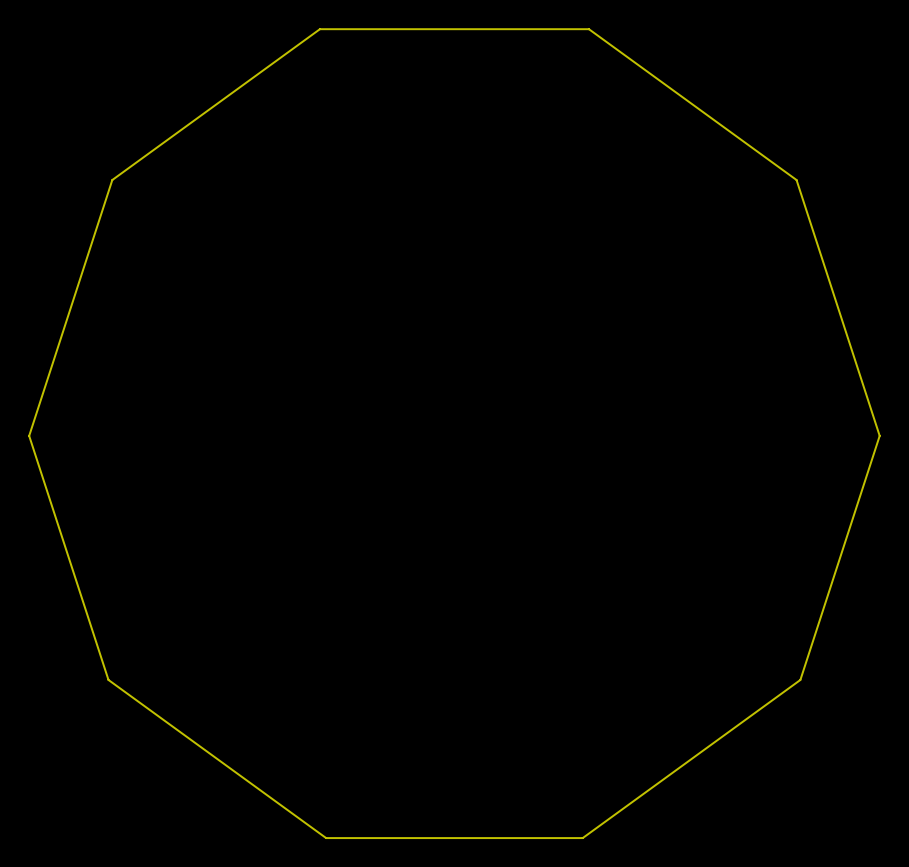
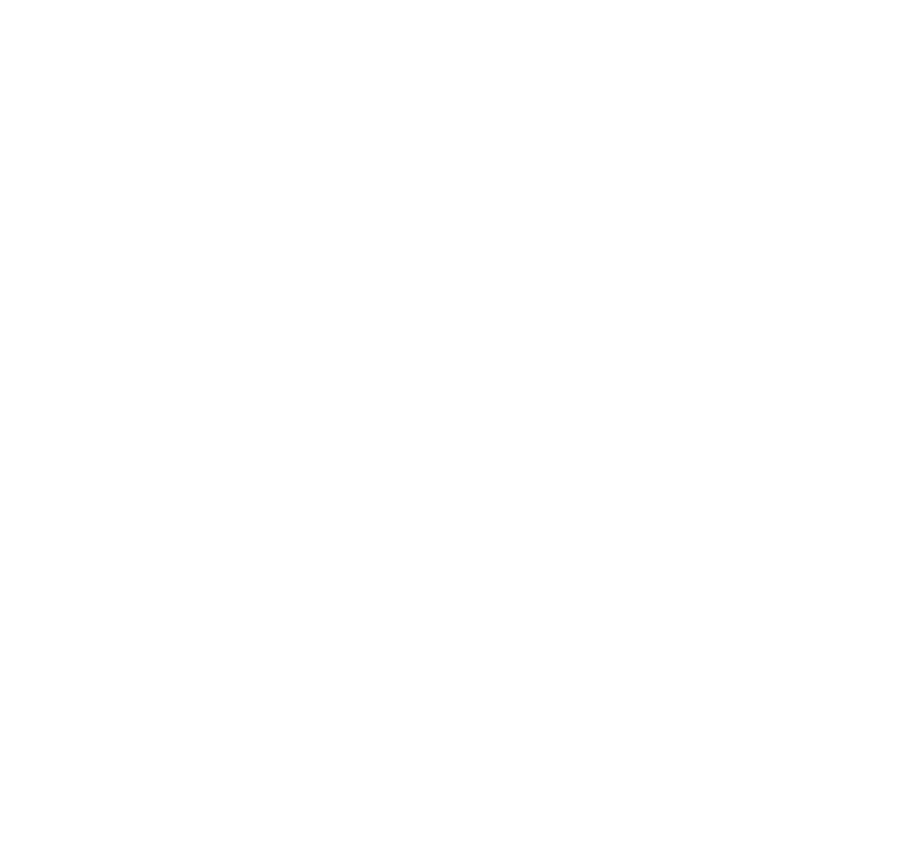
board edge: (319, 29) (588, 29) (796, 180) (879, 435) (800, 679) (582, 838) (326, 838) (108, 679) (29, 435) (112, 180) (319, 29) -> none

